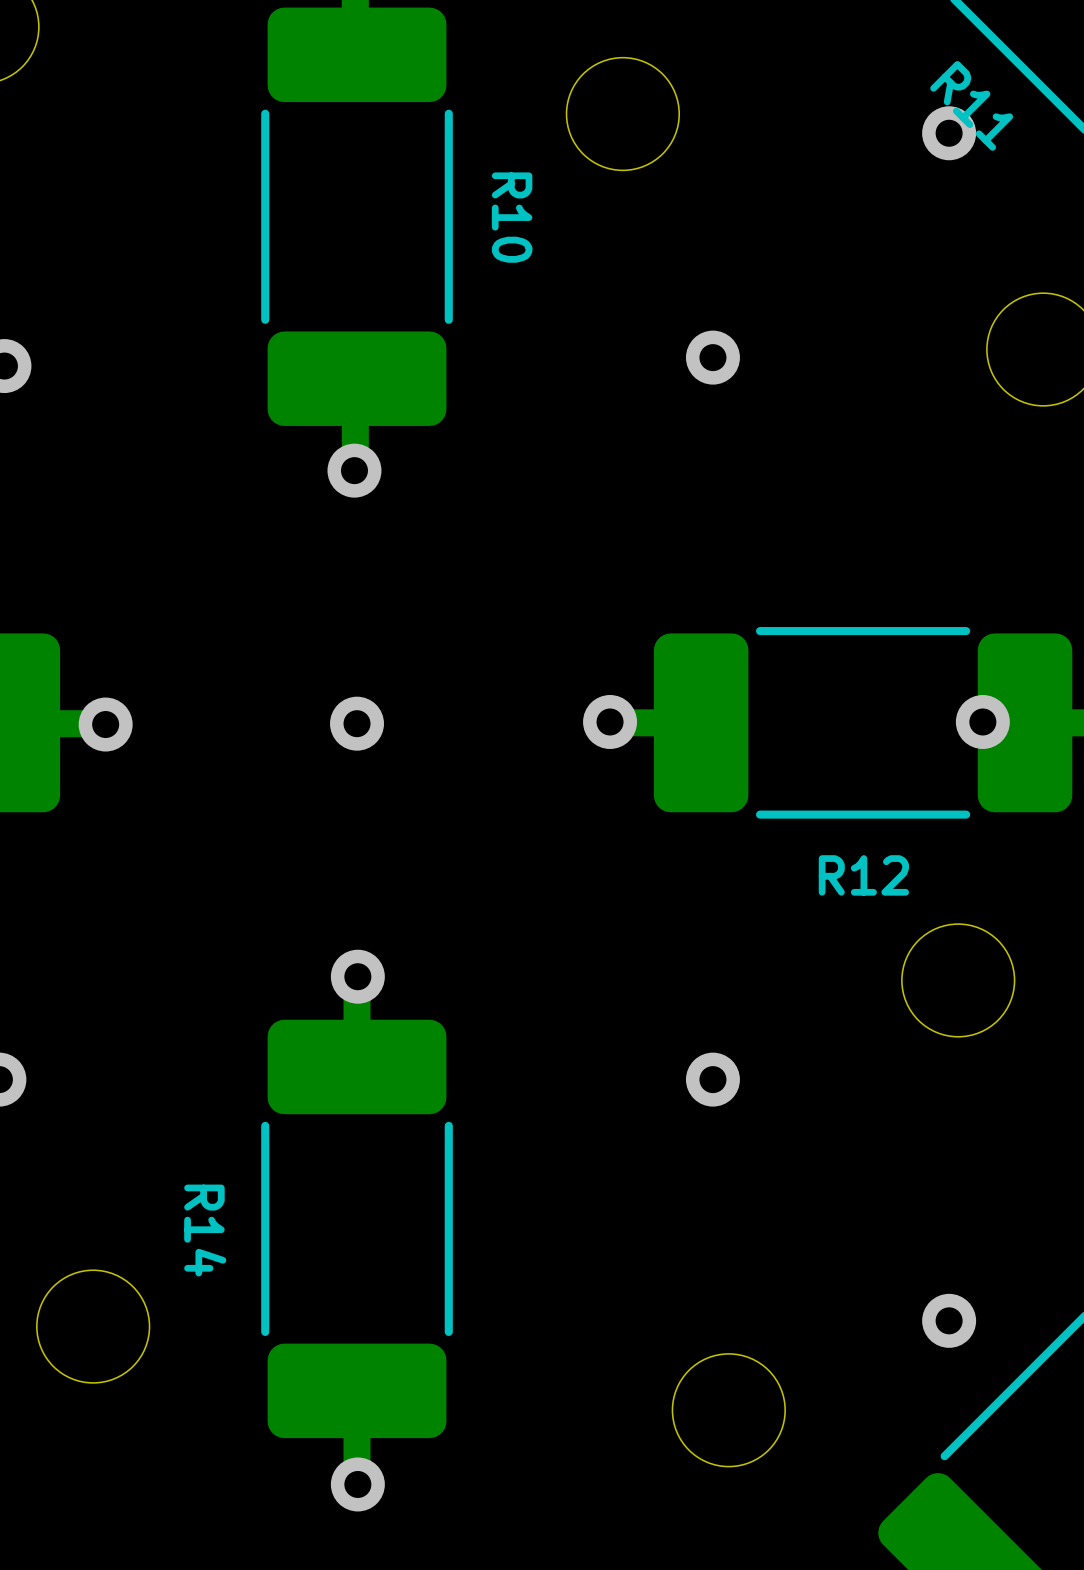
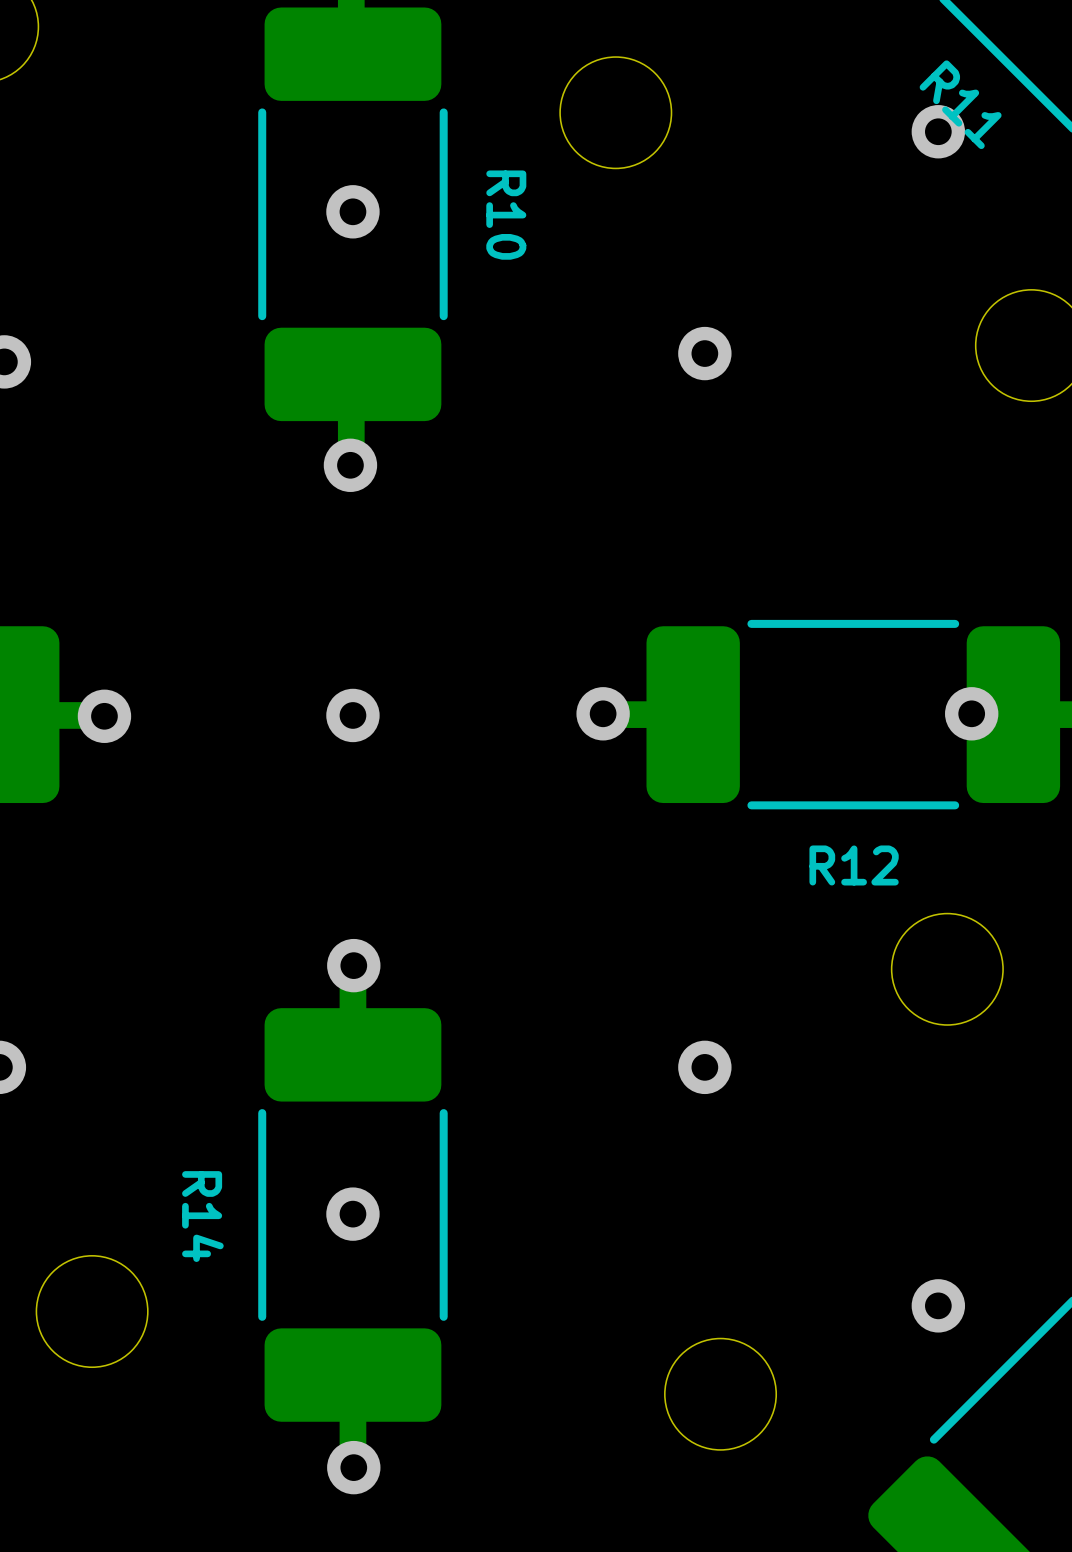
via: none -> (352, 211)
via: none -> (352, 1214)

